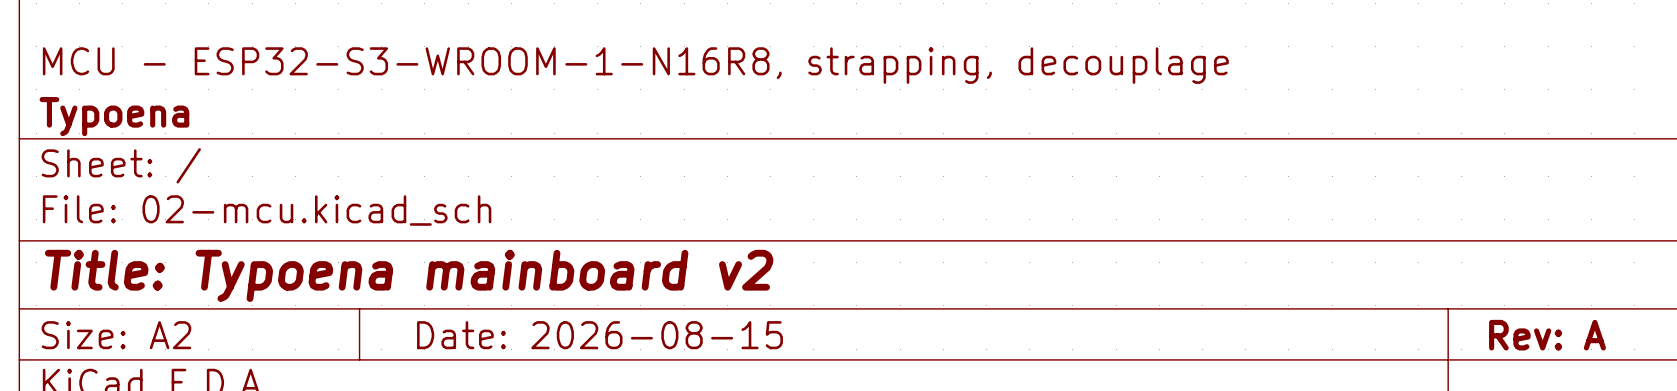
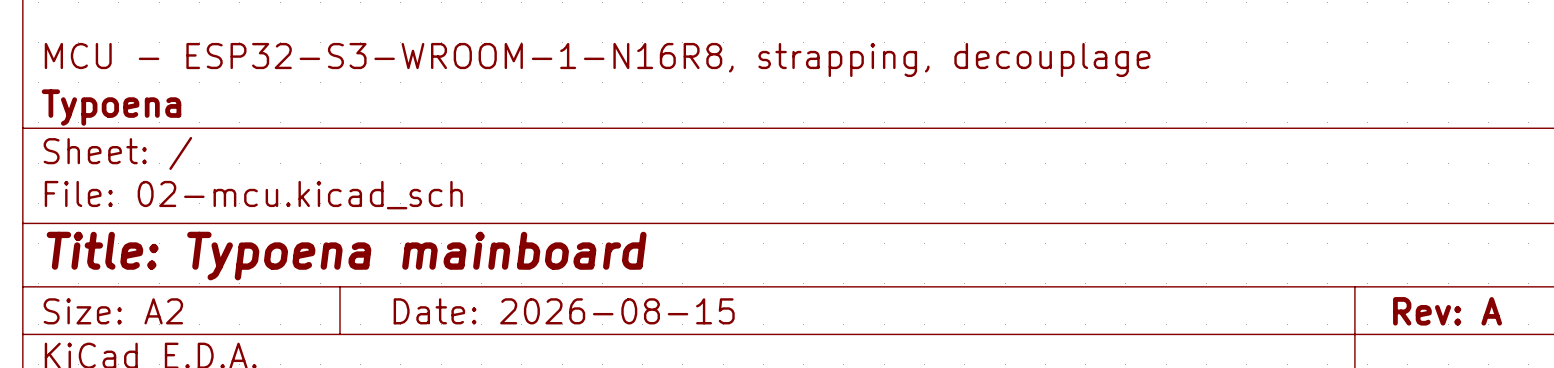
title block: Title: Typoena mainboard v2 (409, 275) -> Title: Typoena mainboard (346, 256)

